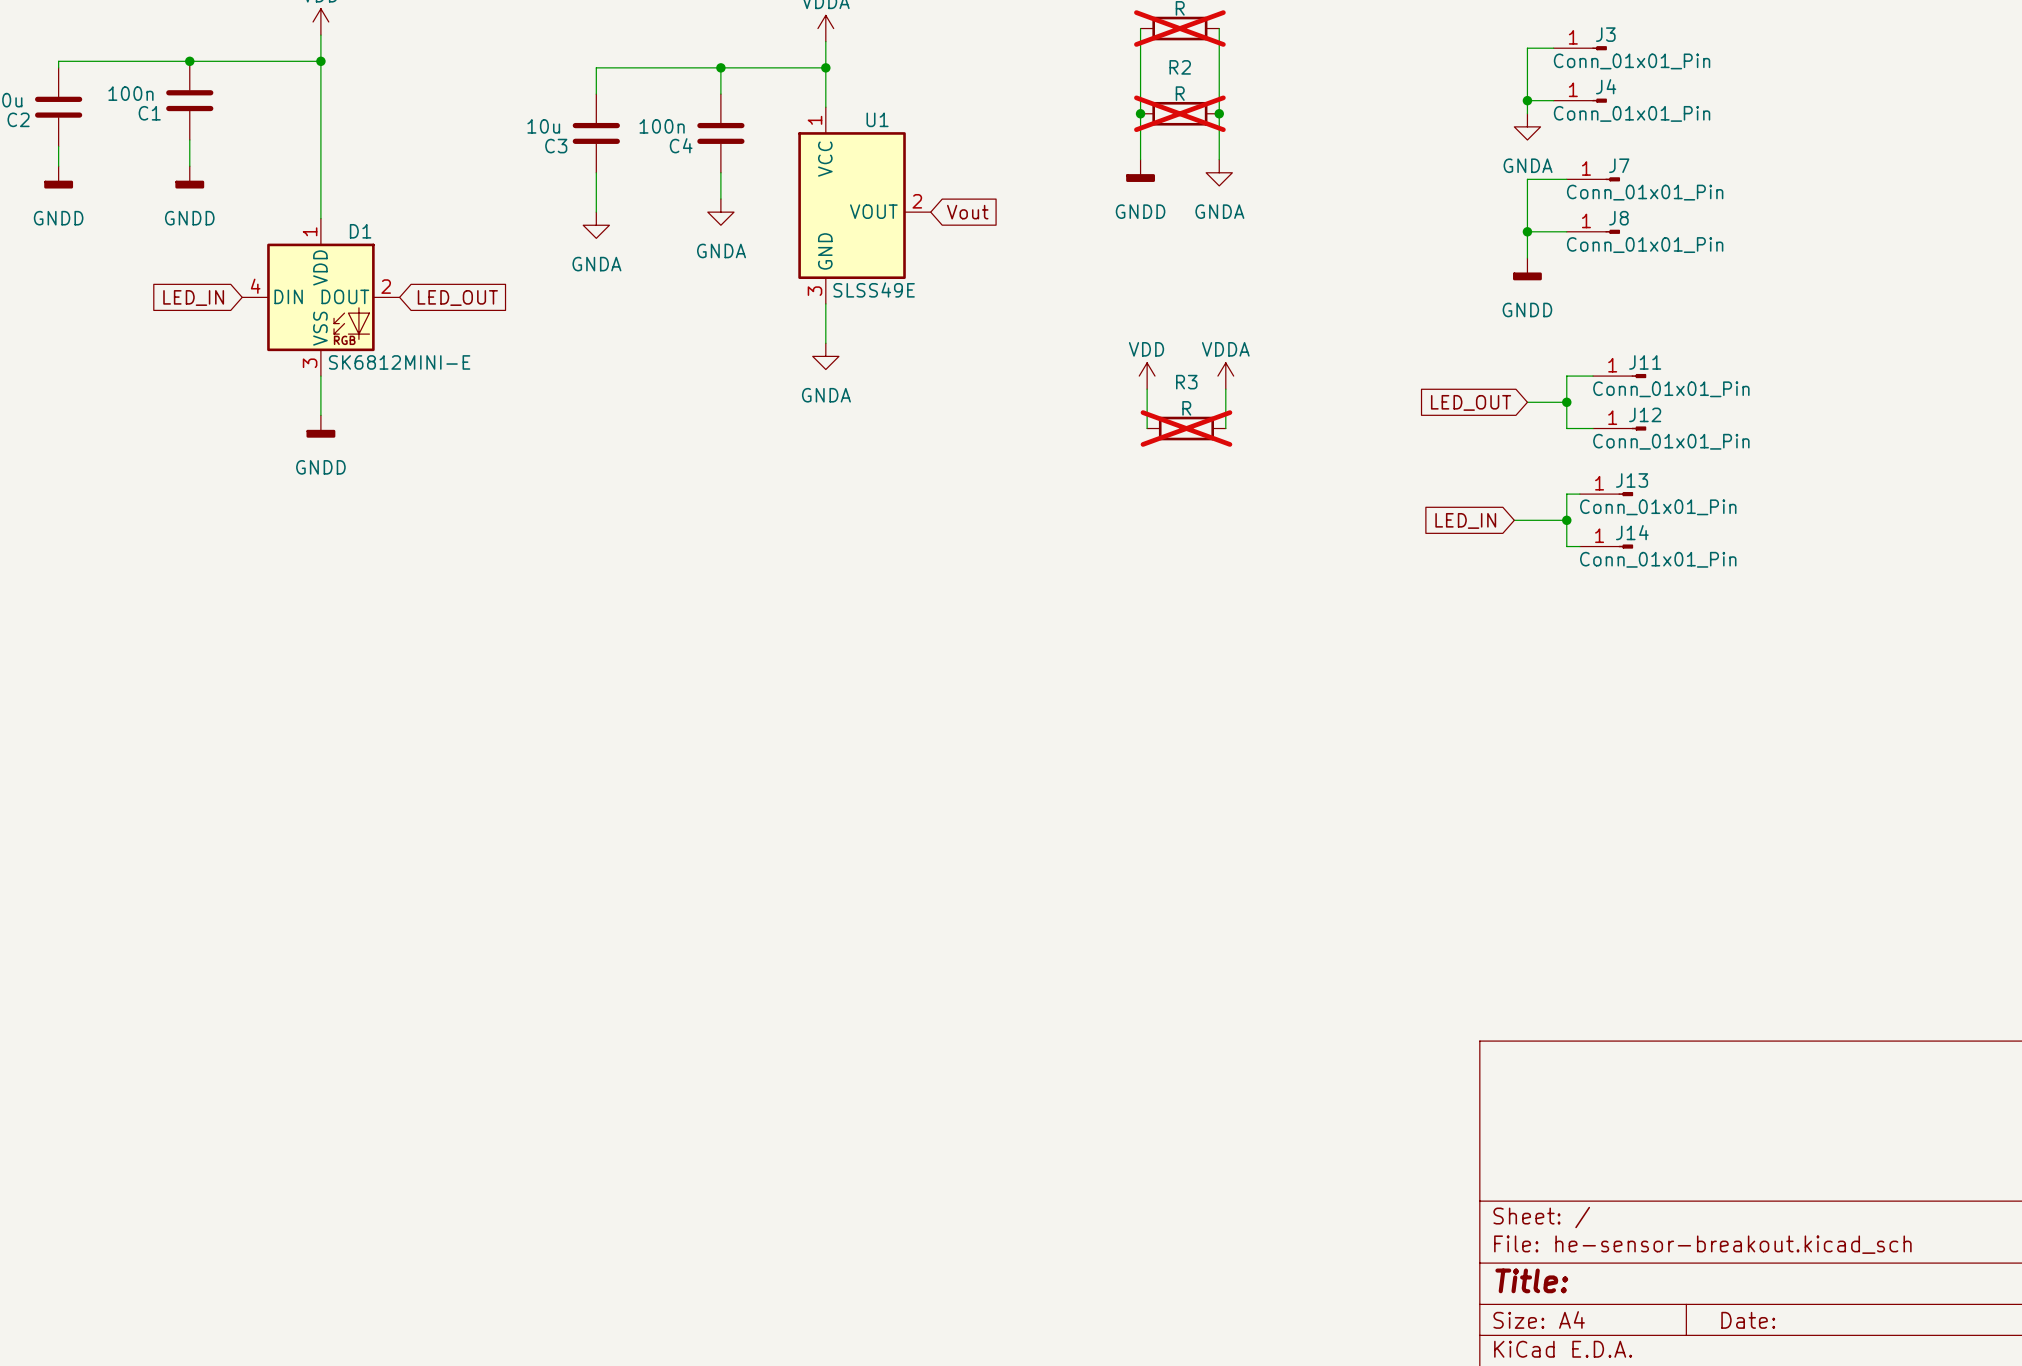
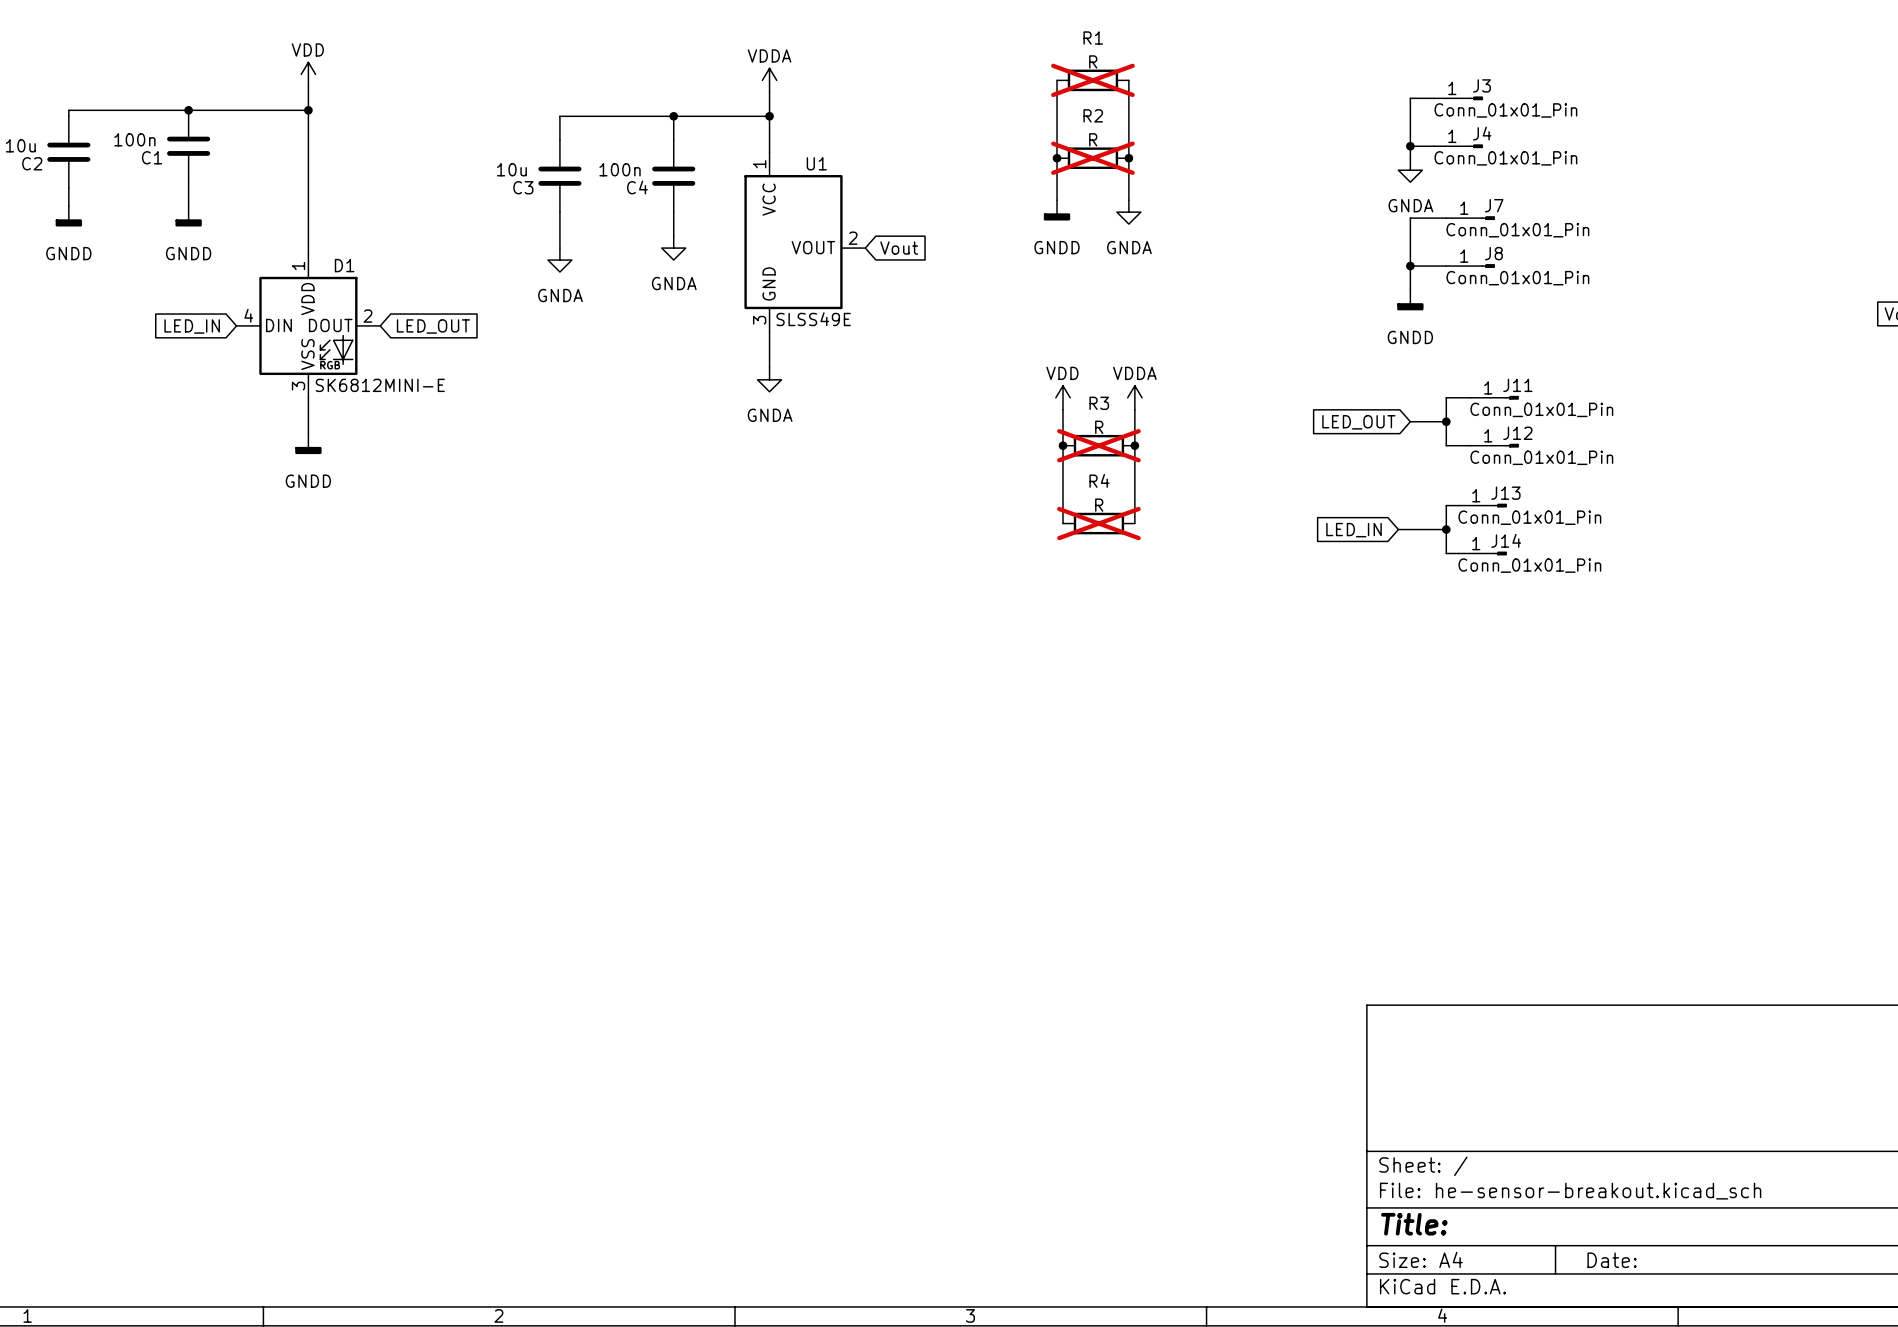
wire: none -> (1063, 445) (1063, 523)
junction: none -> (1063, 445)
wire: none -> (1134, 445) (1134, 523)
junction: none -> (1134, 445)
R4: none -> R (1098, 523)

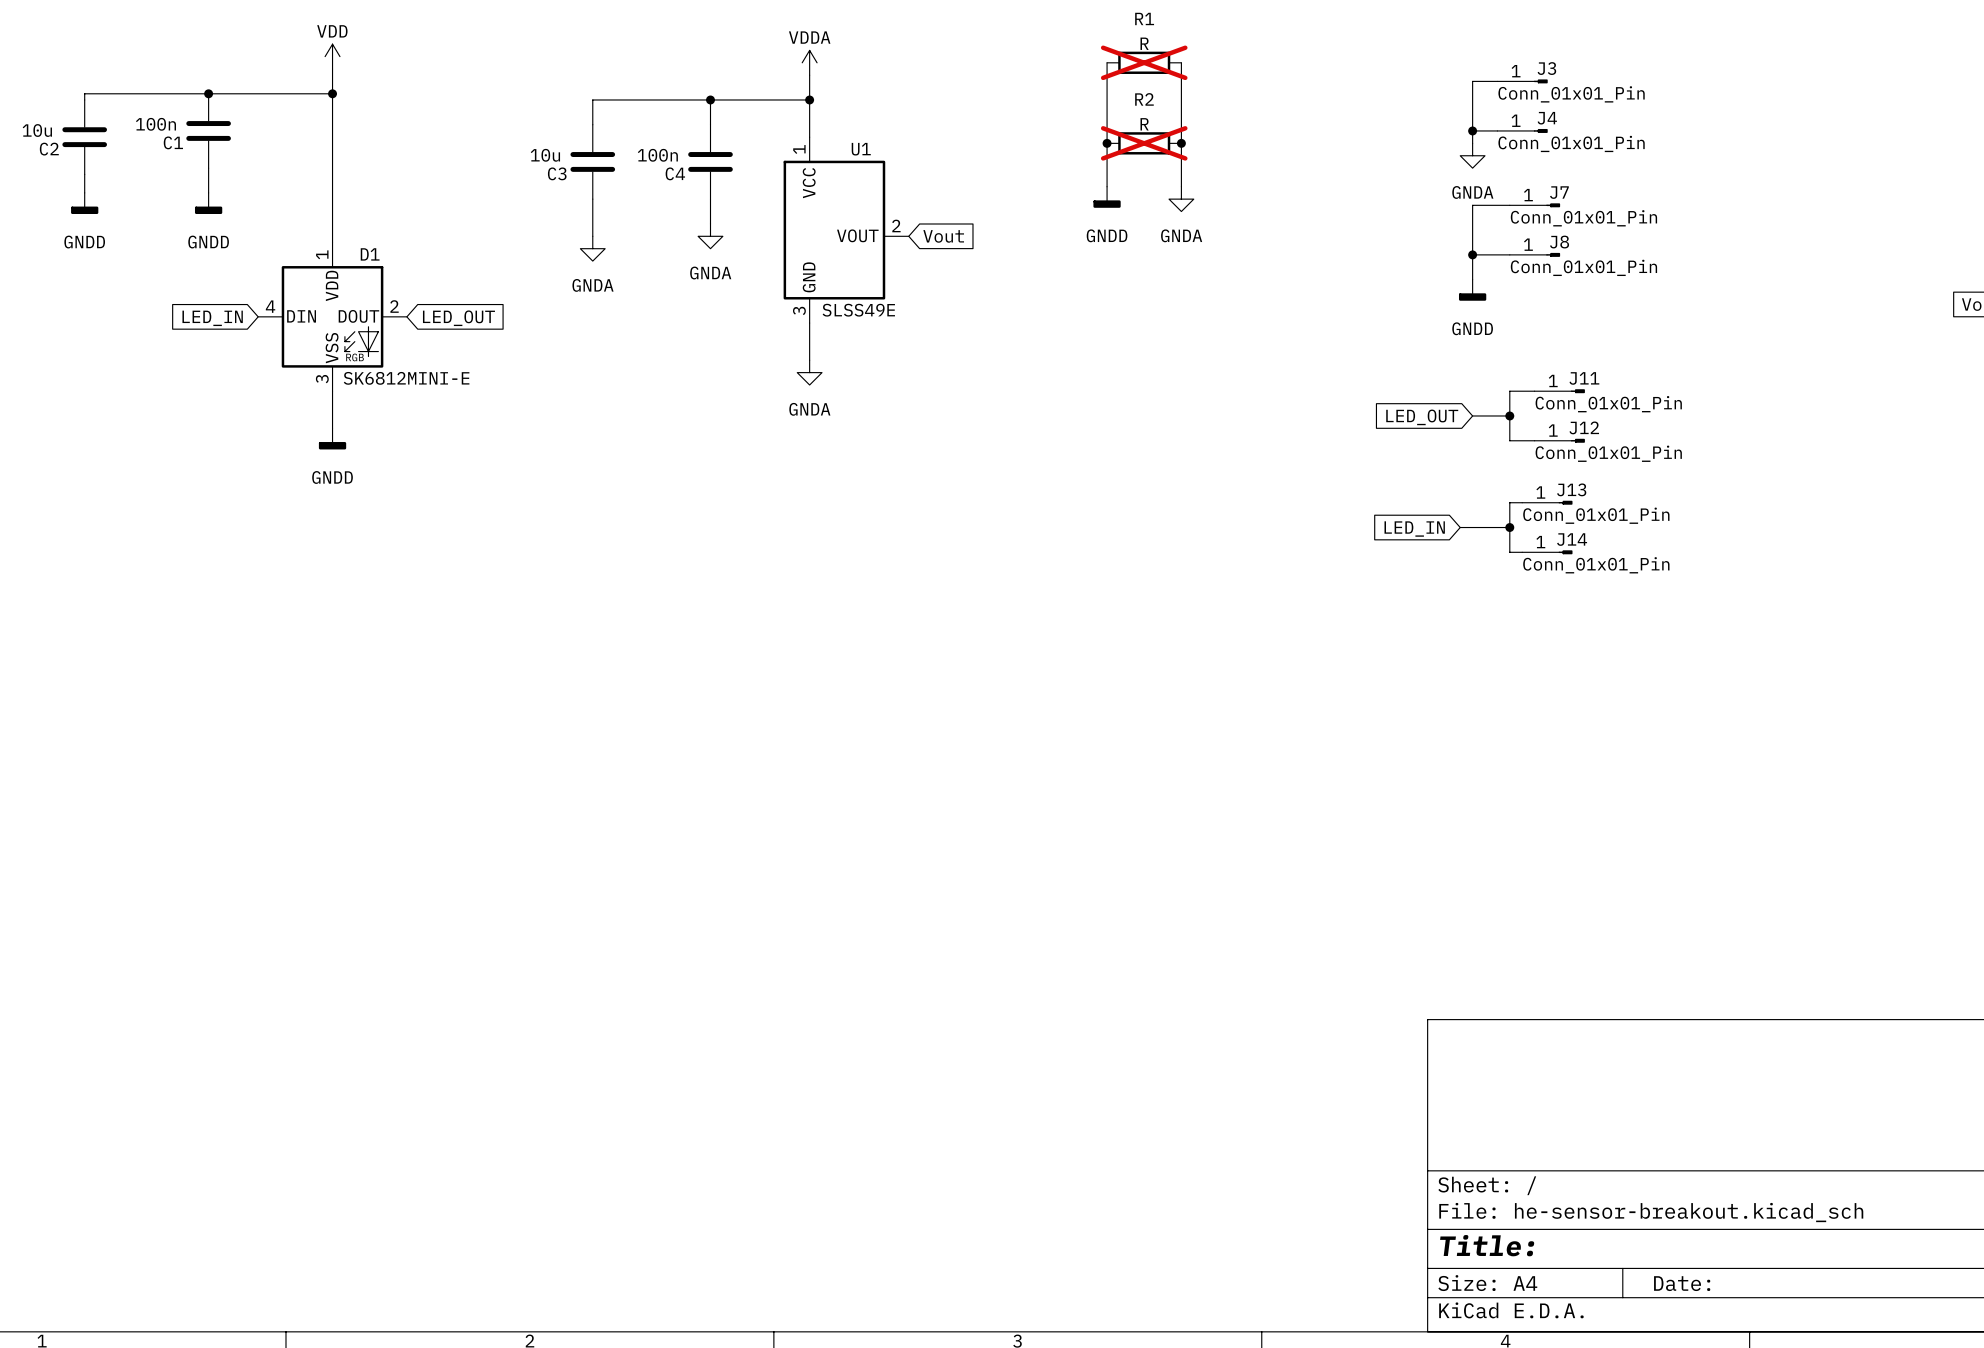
power symbol: VDD (1063, 397) -> none
power symbol: VDDA (1134, 397) -> none
wire: (1063, 409) (1063, 523) -> none
wire: (1134, 409) (1134, 523) -> none
junction: (1063, 445) -> none
R3: R (1098, 445) -> none
junction: (1134, 445) -> none
R4: R (1098, 523) -> none

